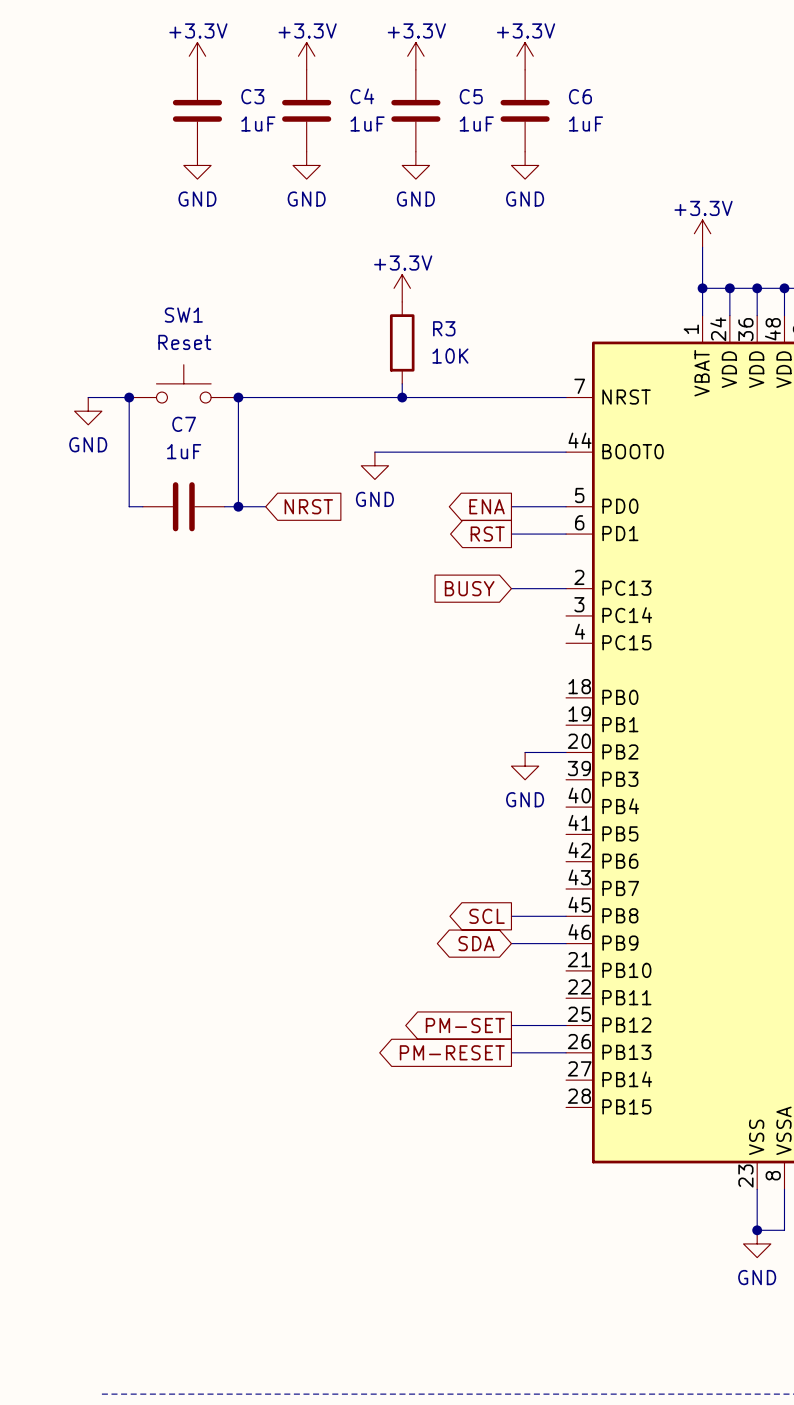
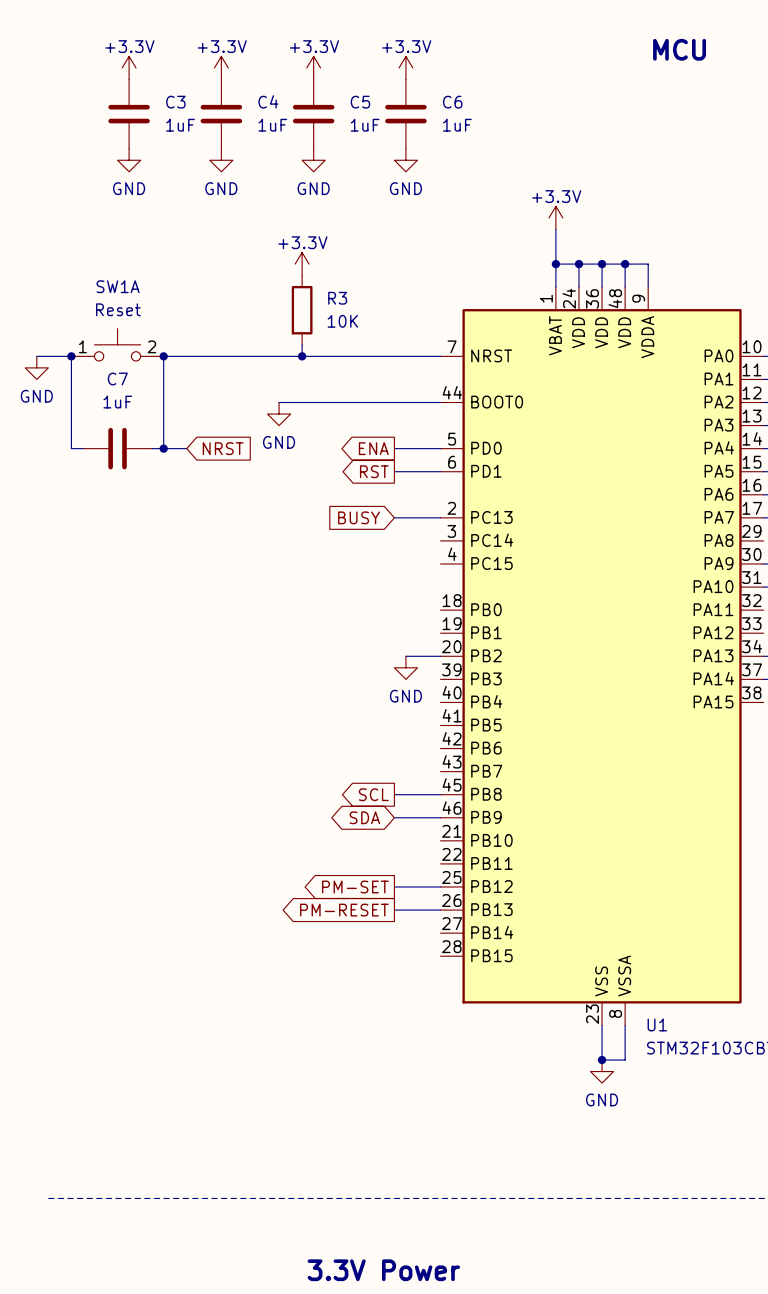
SW1 name: SW1 (183, 315) -> SW1A (118, 286)
SW1 pin number: none -> 1 (82, 346)
SW1 pin number: none -> 2 (151, 346)

